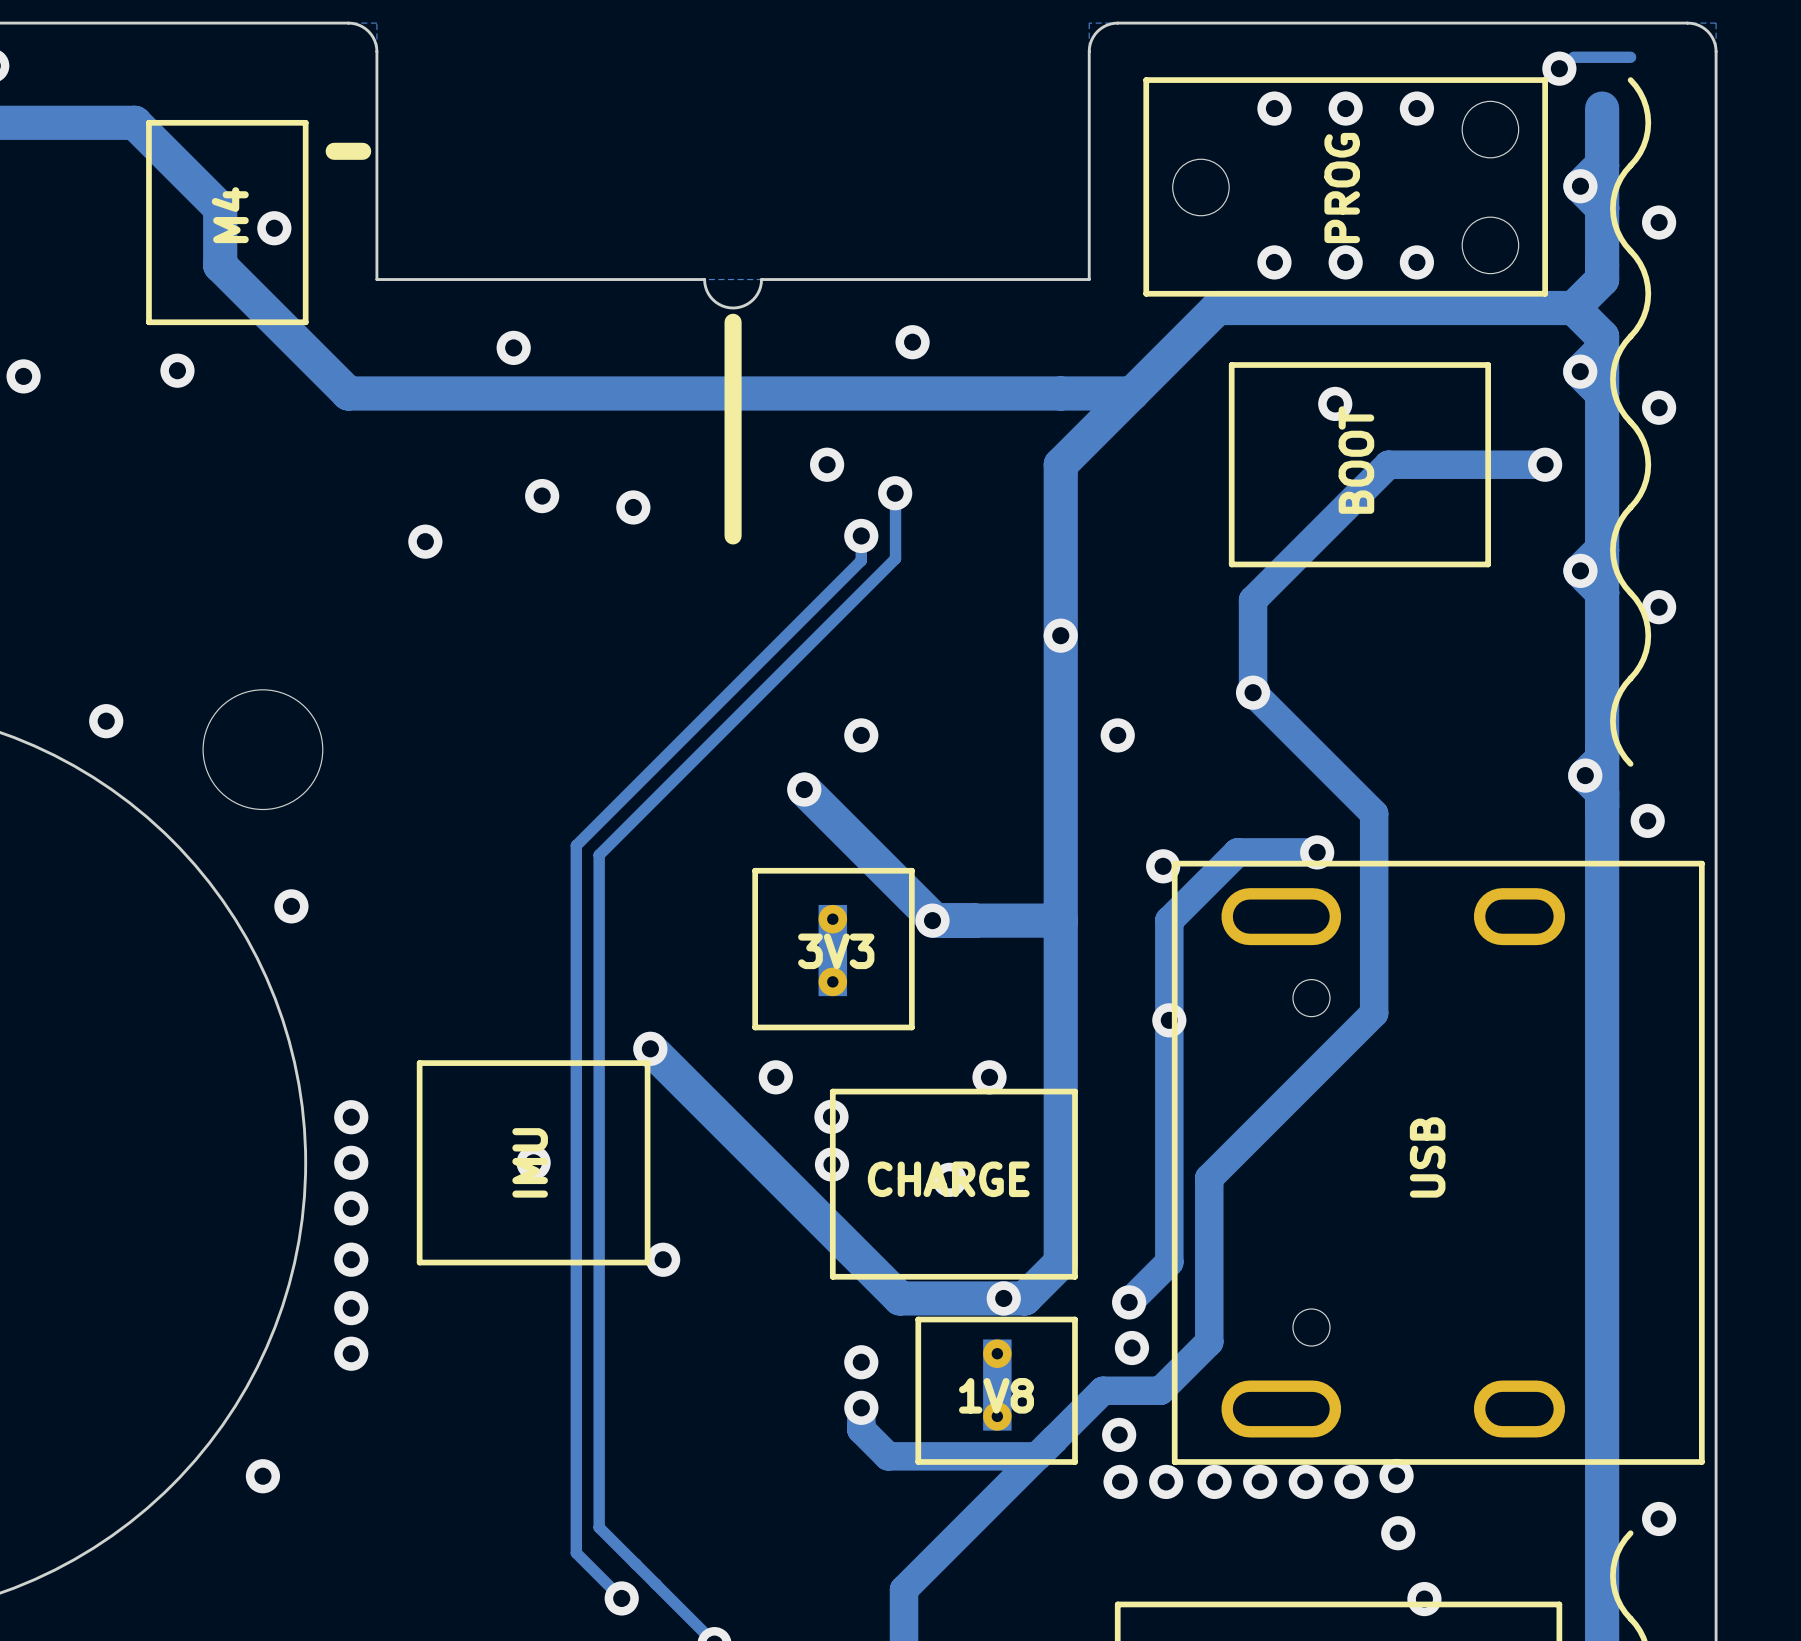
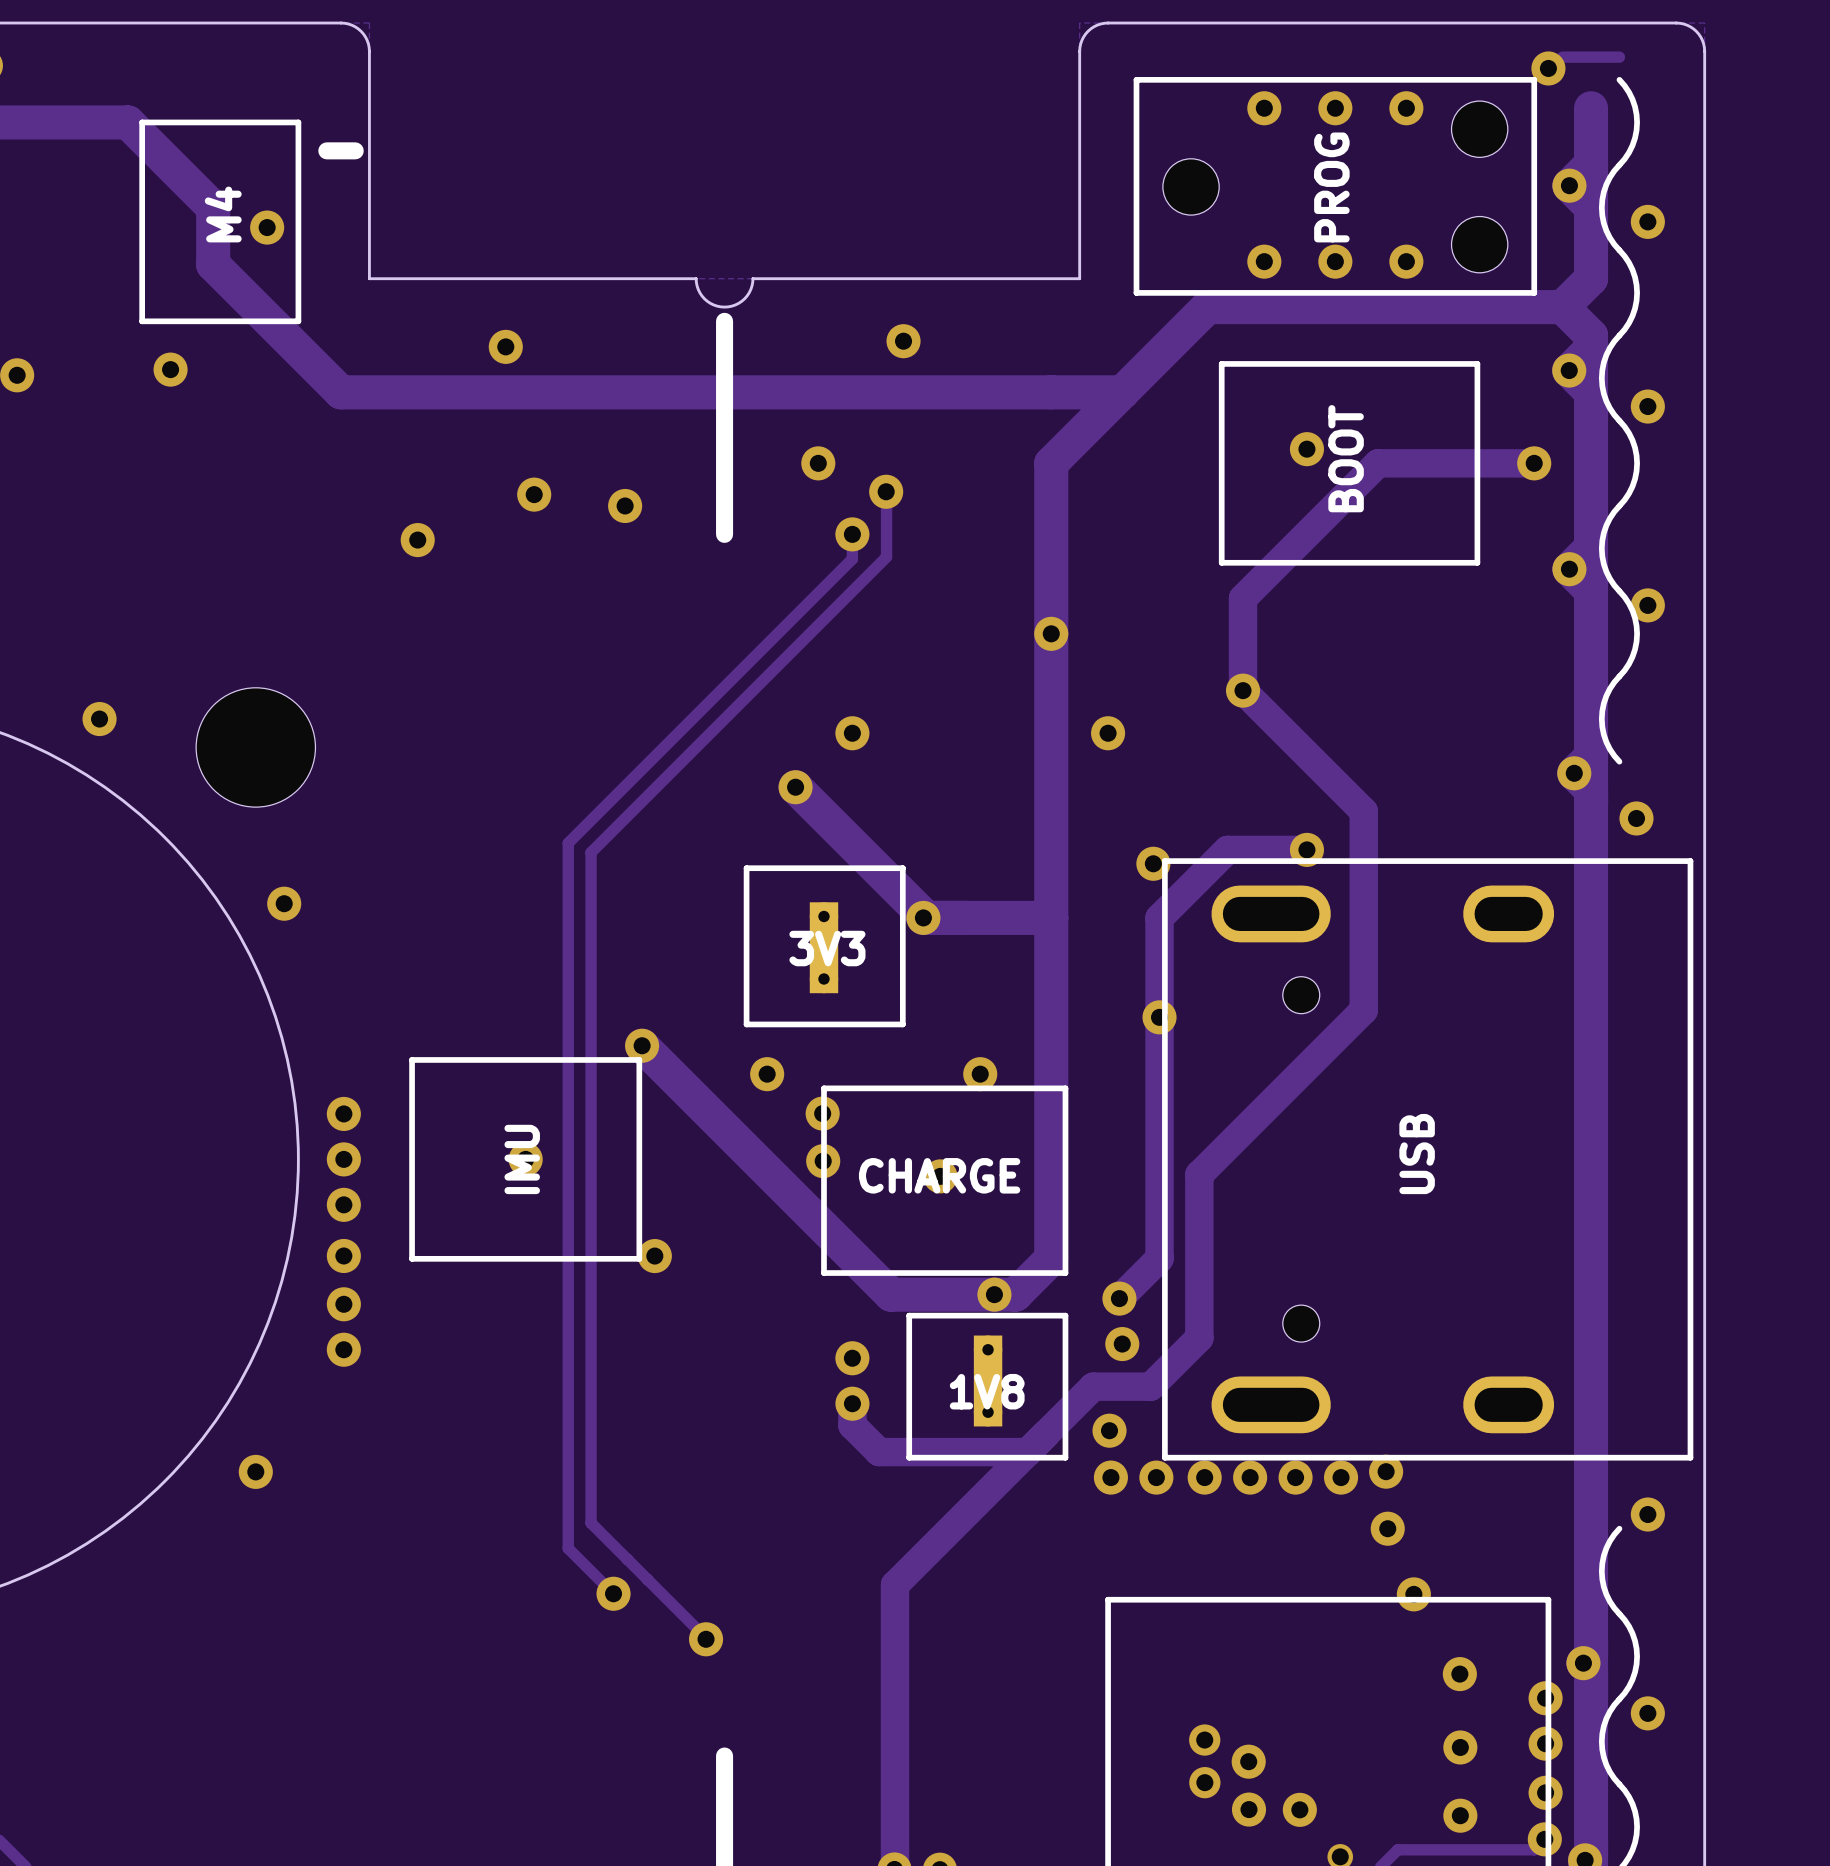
via position: (1335, 403) -> (1306, 449)

